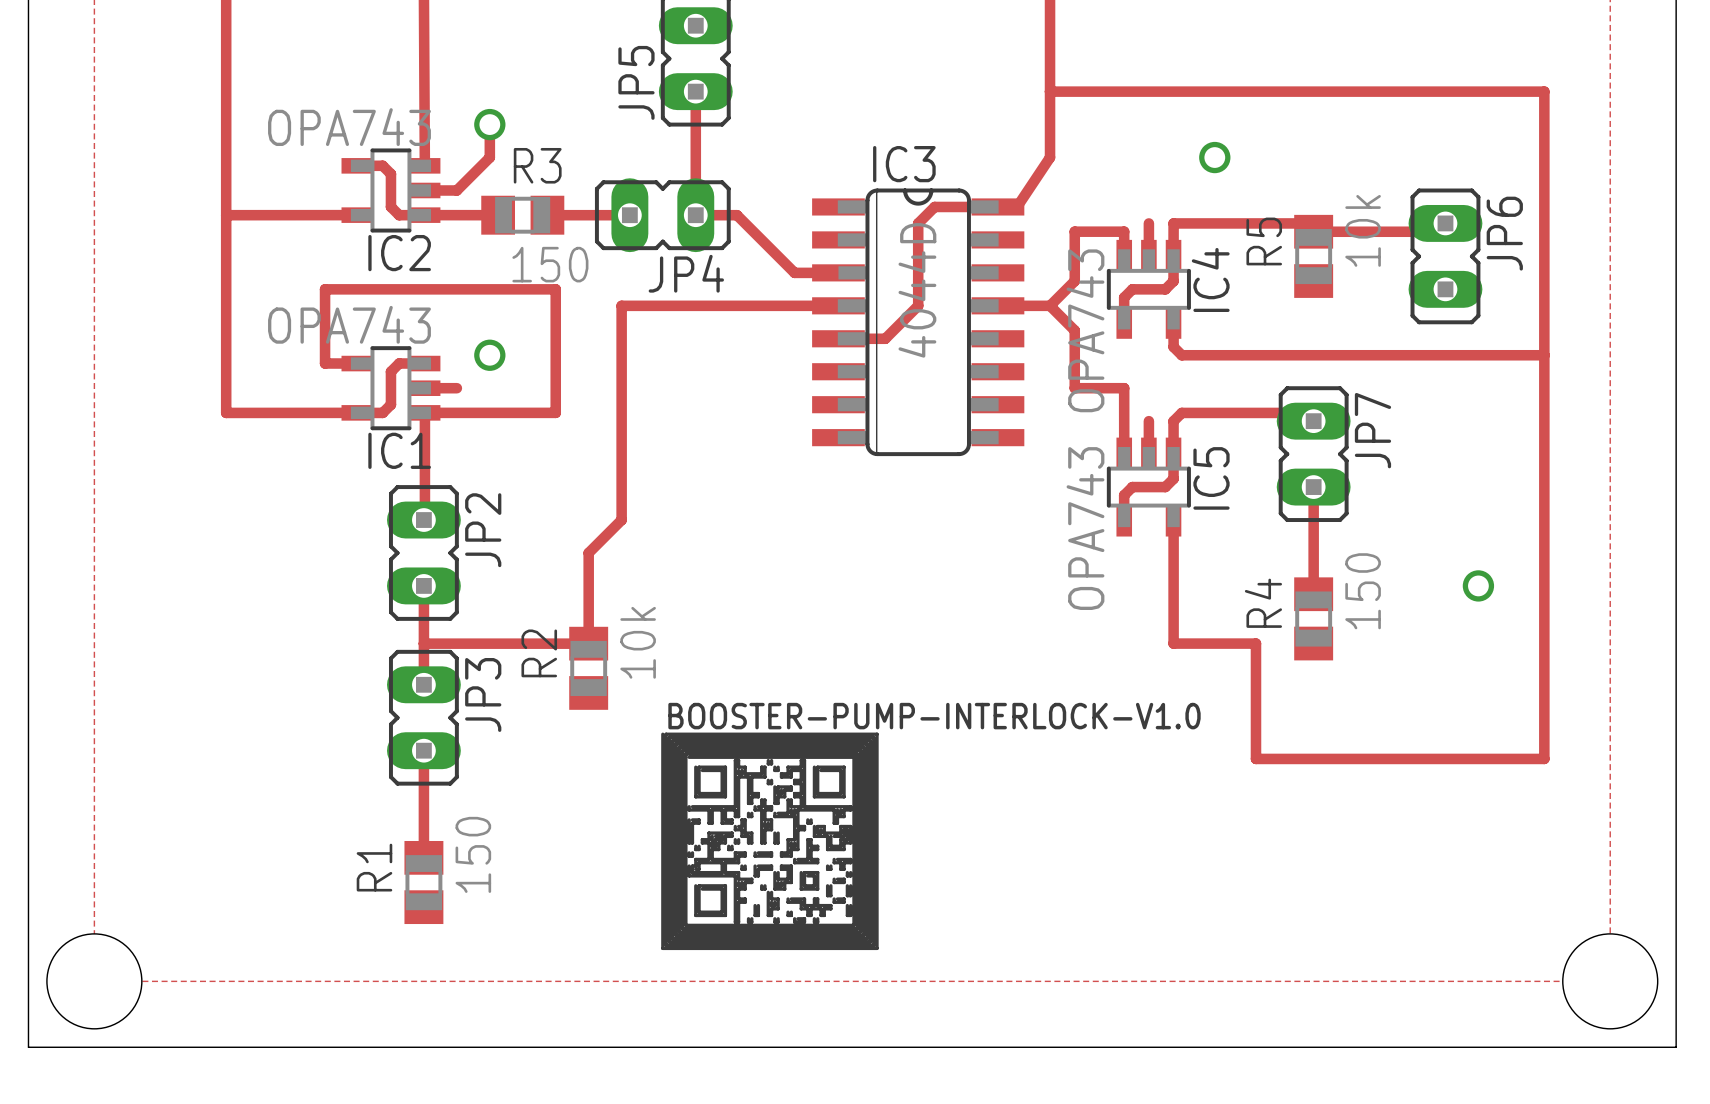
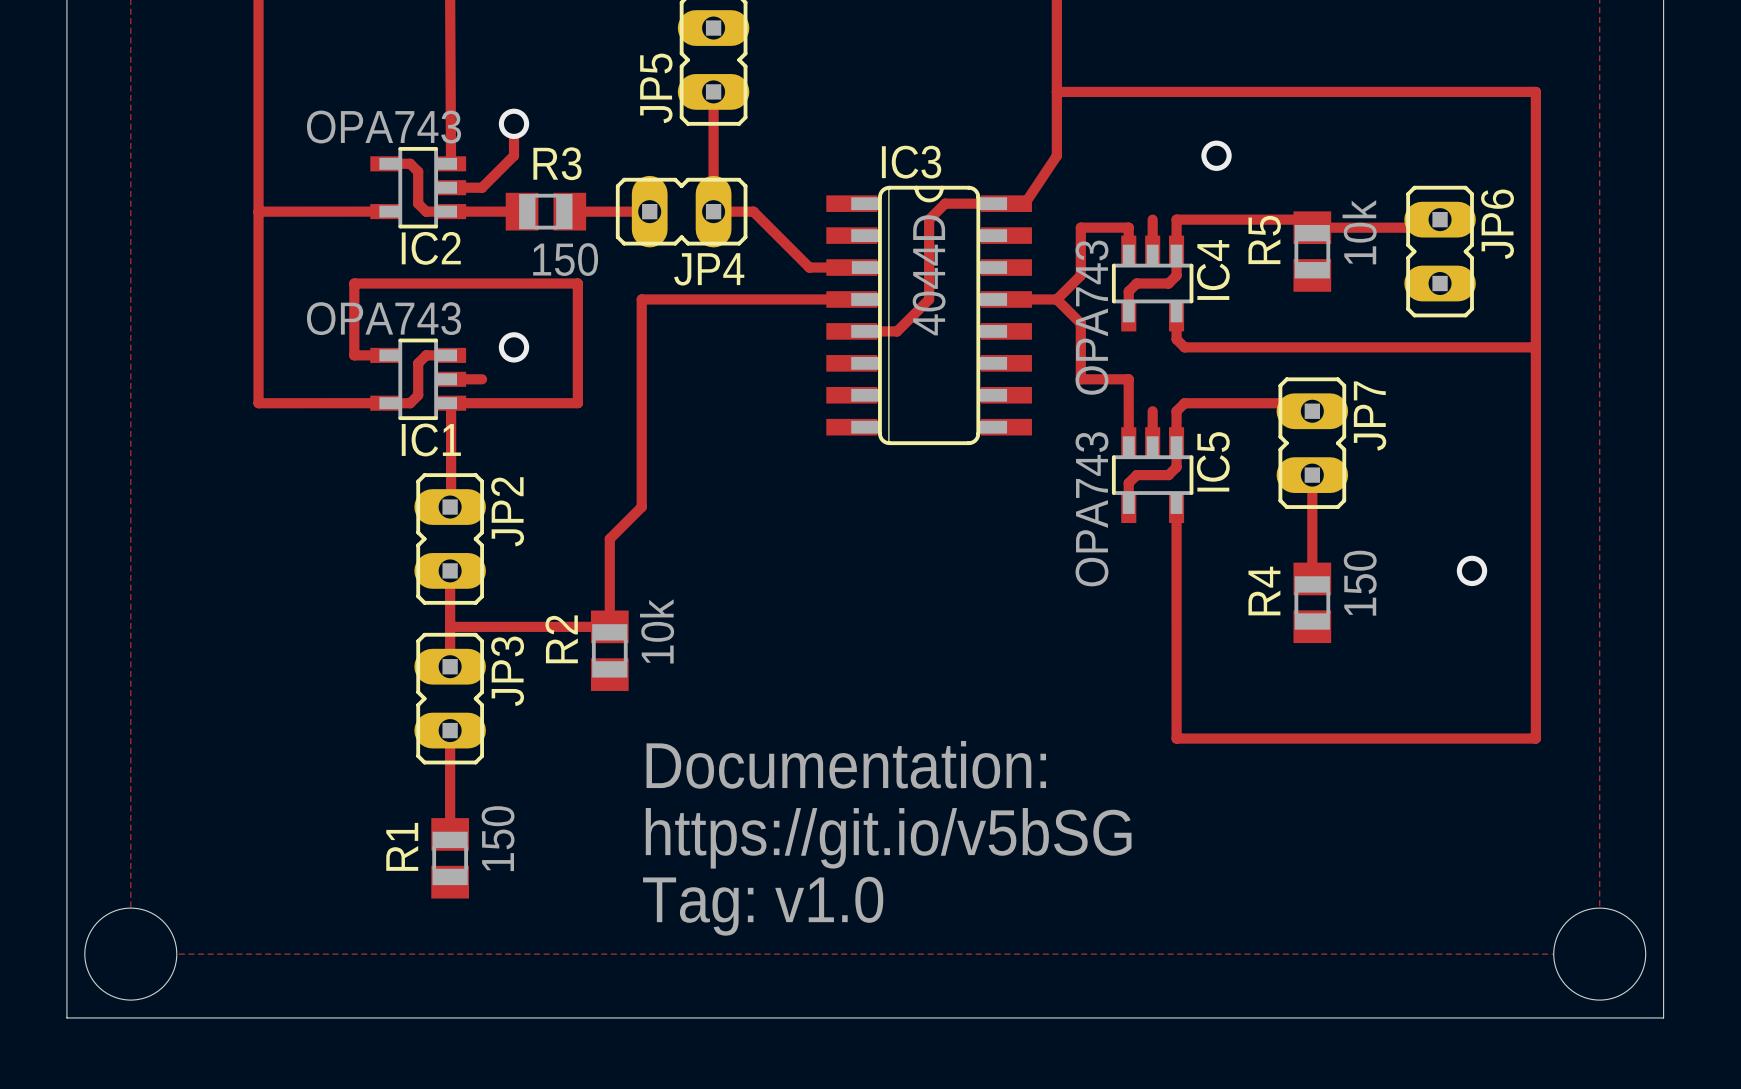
track: (1173, 520) (1173, 643) (1255, 643) (1255, 758) -> (1176, 507) (1176, 738) (1256, 738)
text: none -> Documentation: (846, 764)
BOOSTER-PUMP-INTERLOCK-V1.0: (769, 841) -> none
text: none -> https://git.io/v5bSG (888, 838)
text: none -> Tag: v1.0 (763, 906)

